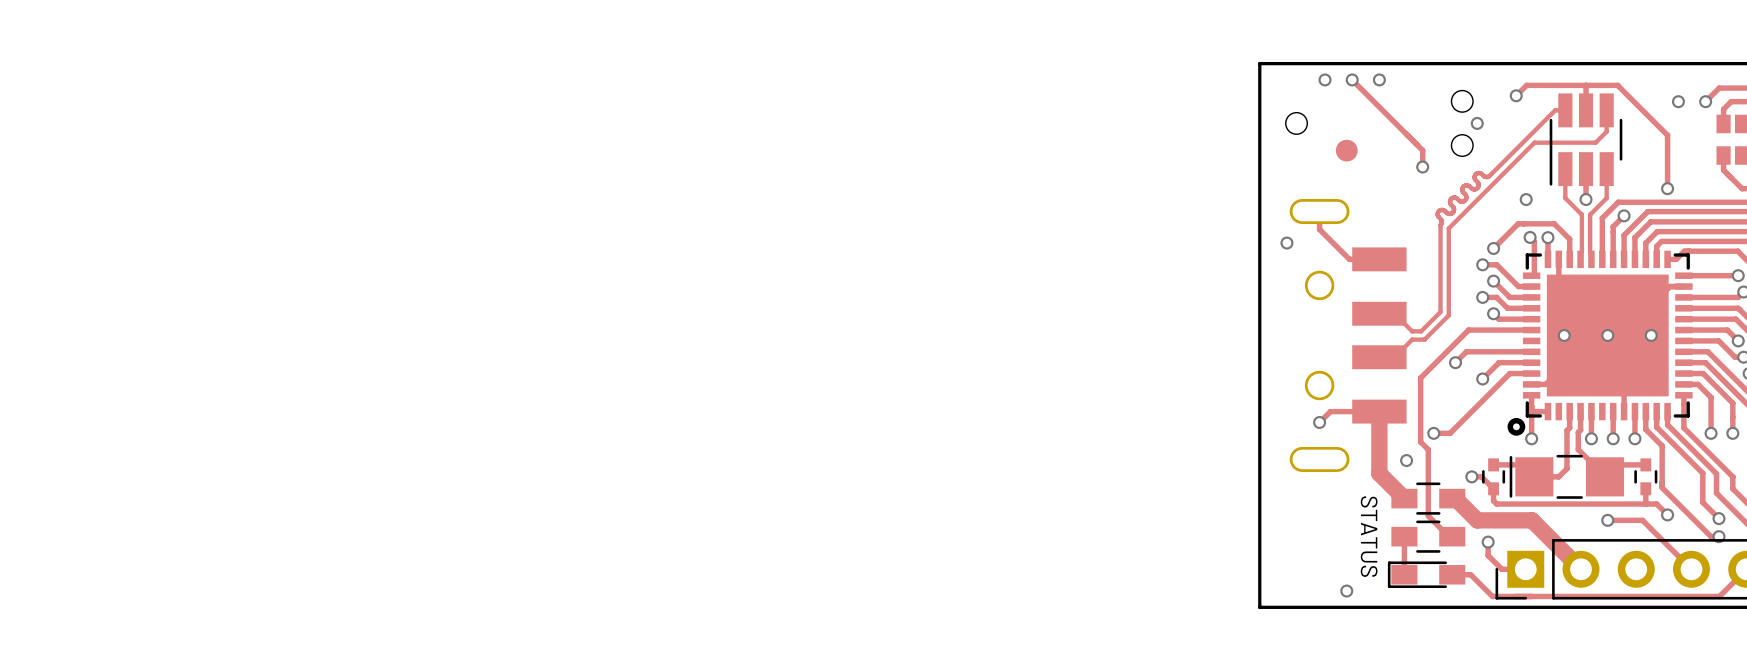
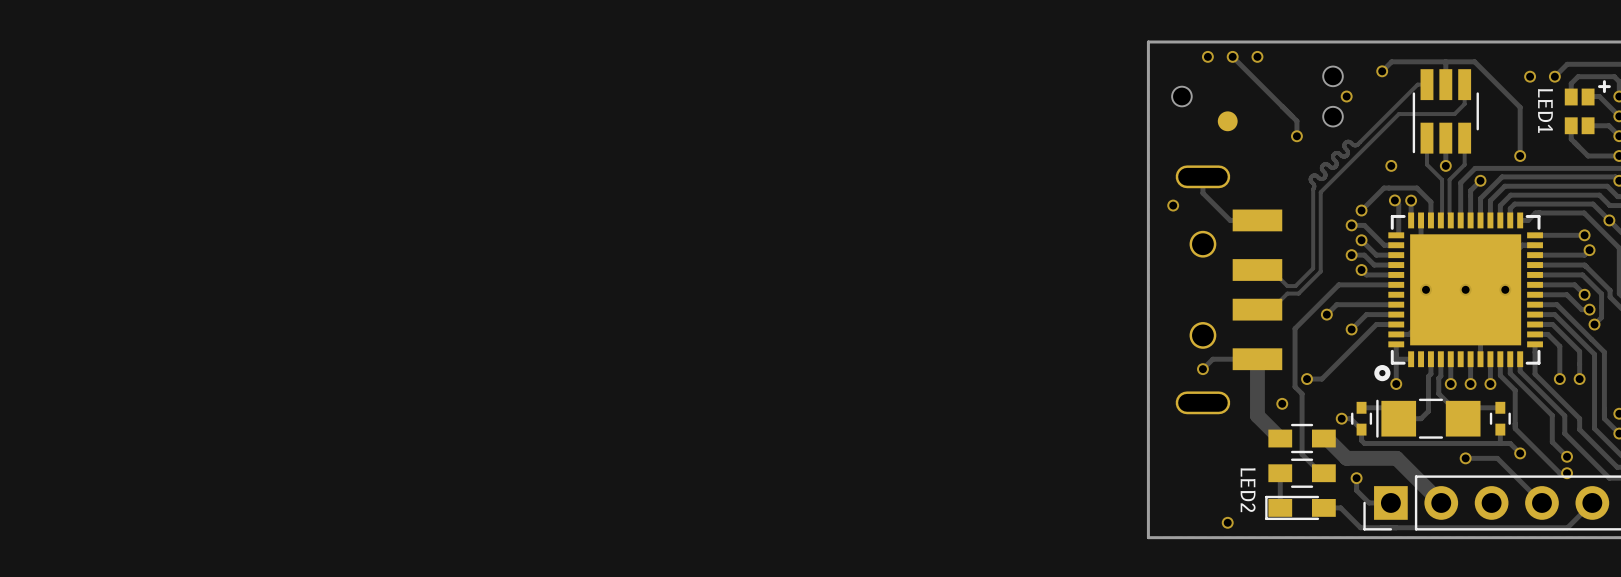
text: none -> LED1 (1545, 110)
text: STATUS (1369, 536) -> LED2 (1248, 490)

